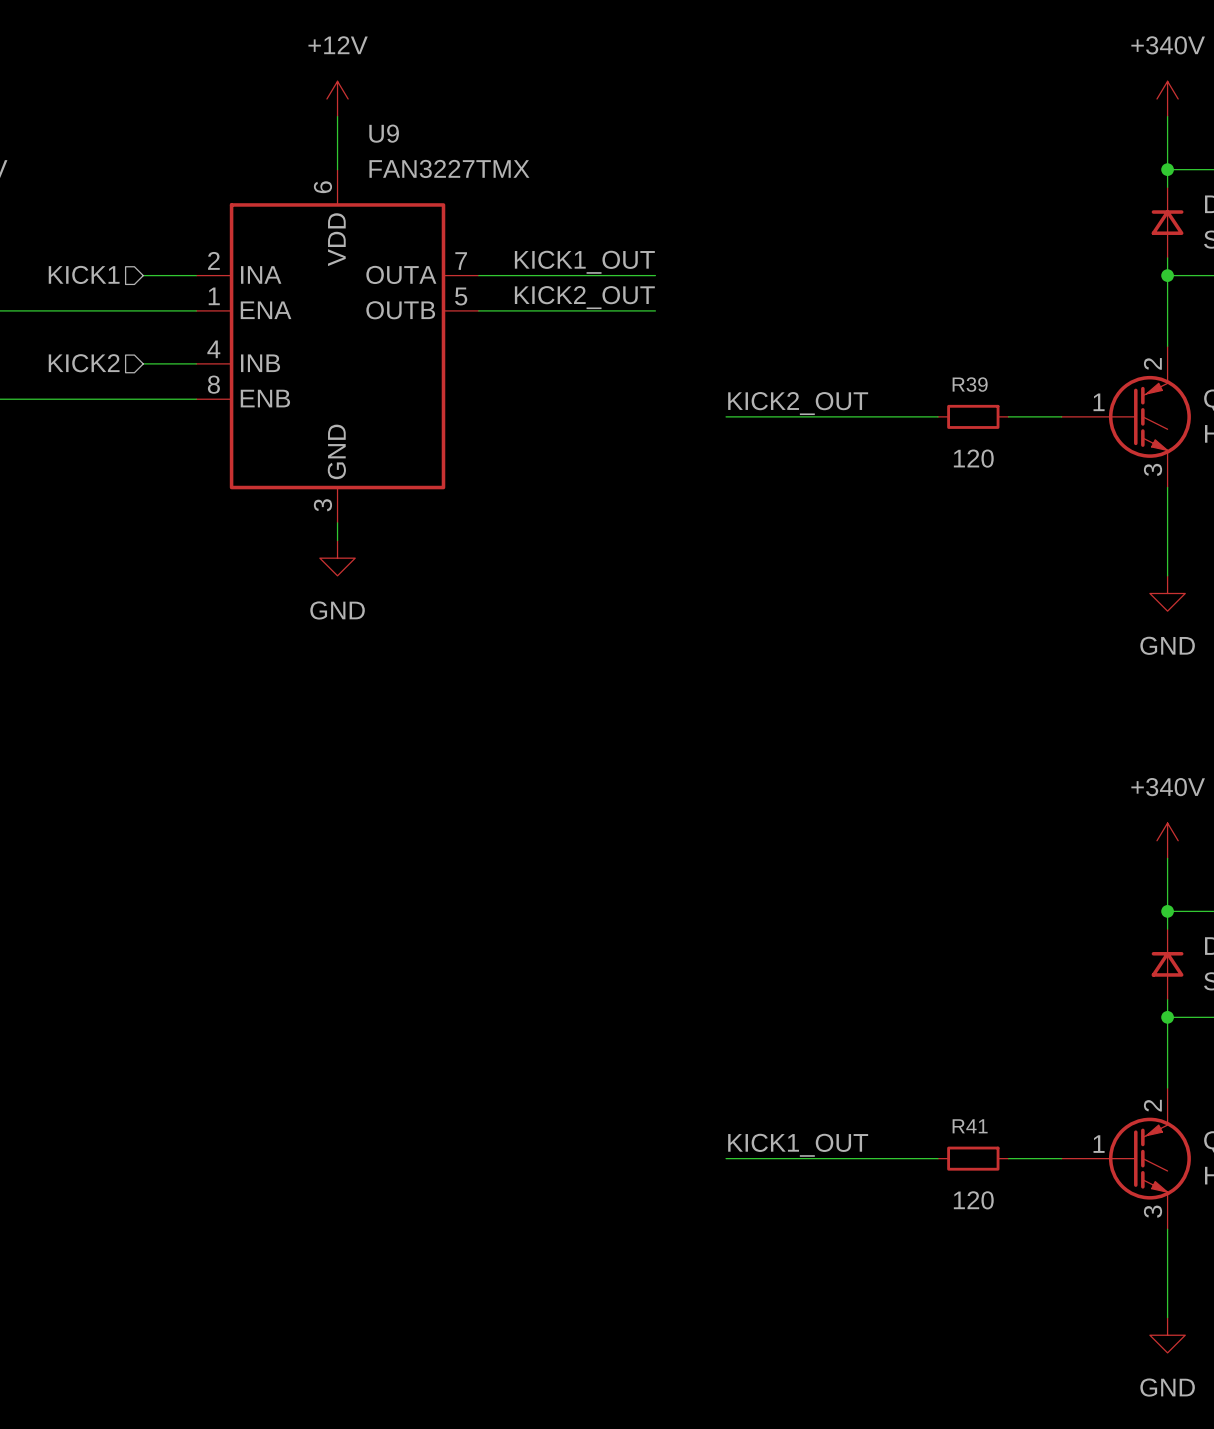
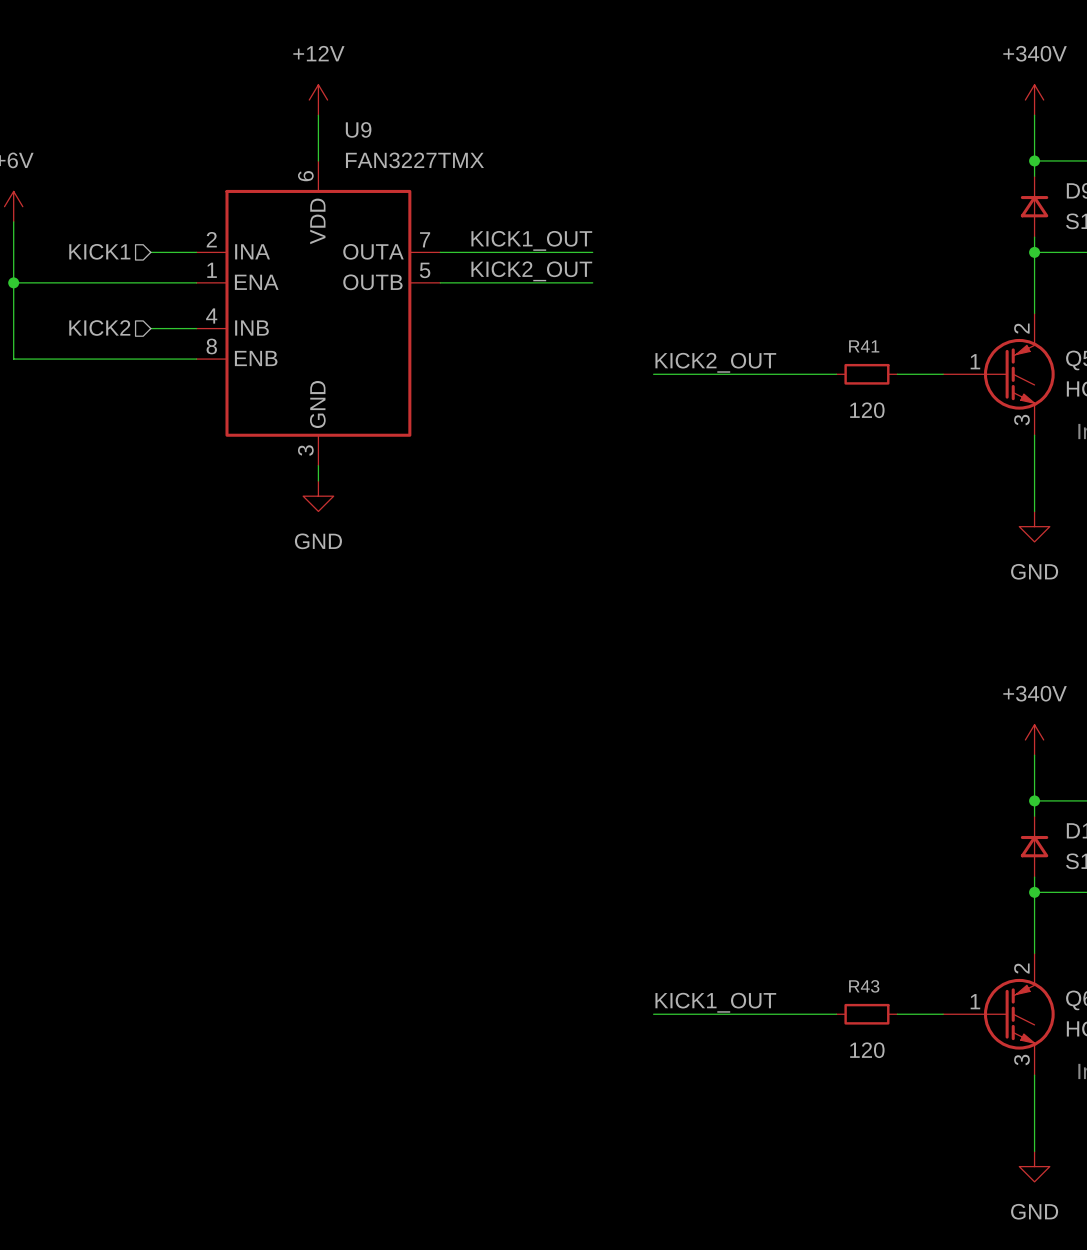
R39 name: R39 (970, 384) -> R41 (864, 346)
R41 name: R41 (970, 1126) -> R43 (864, 986)

